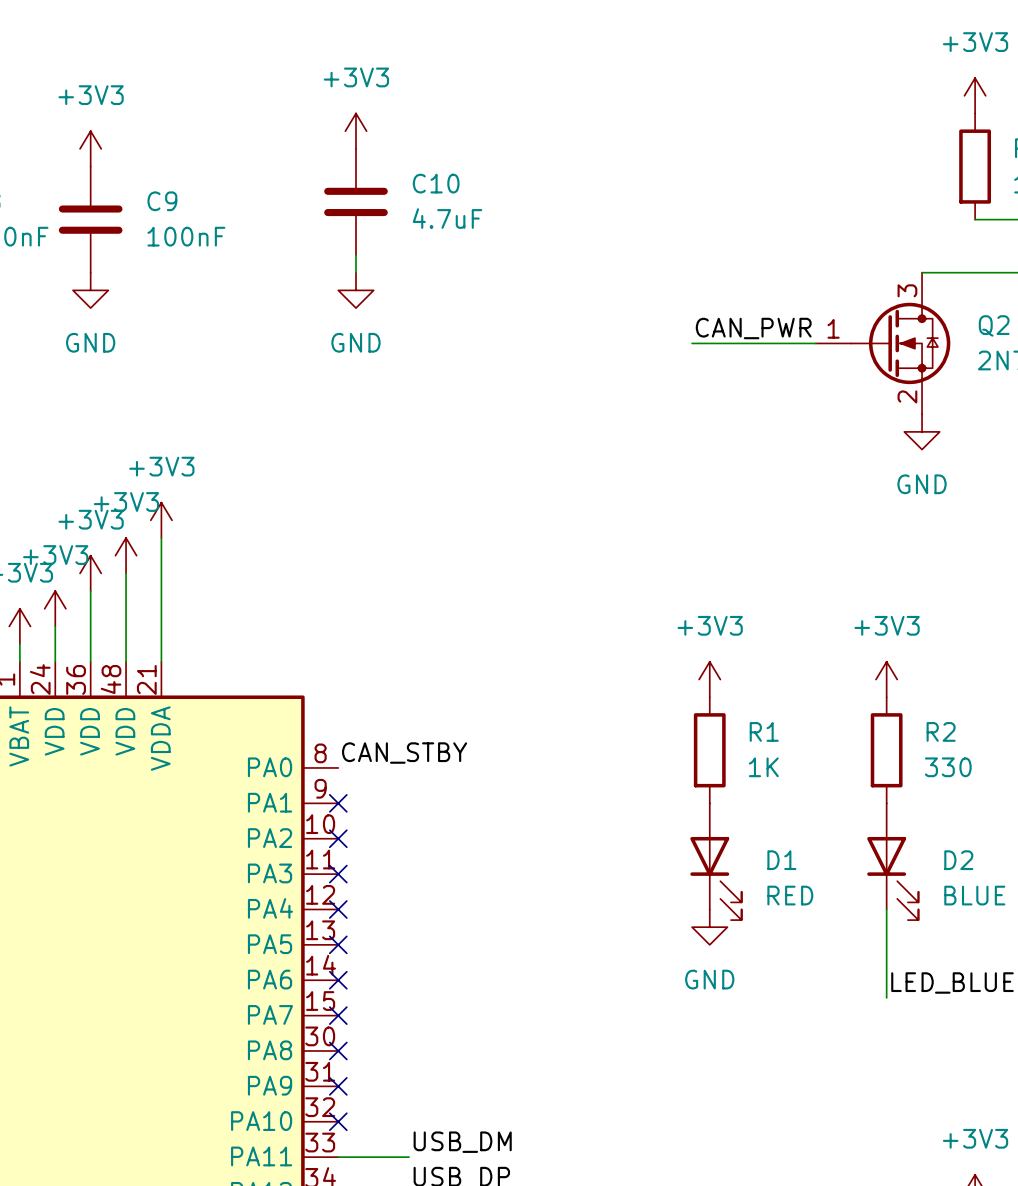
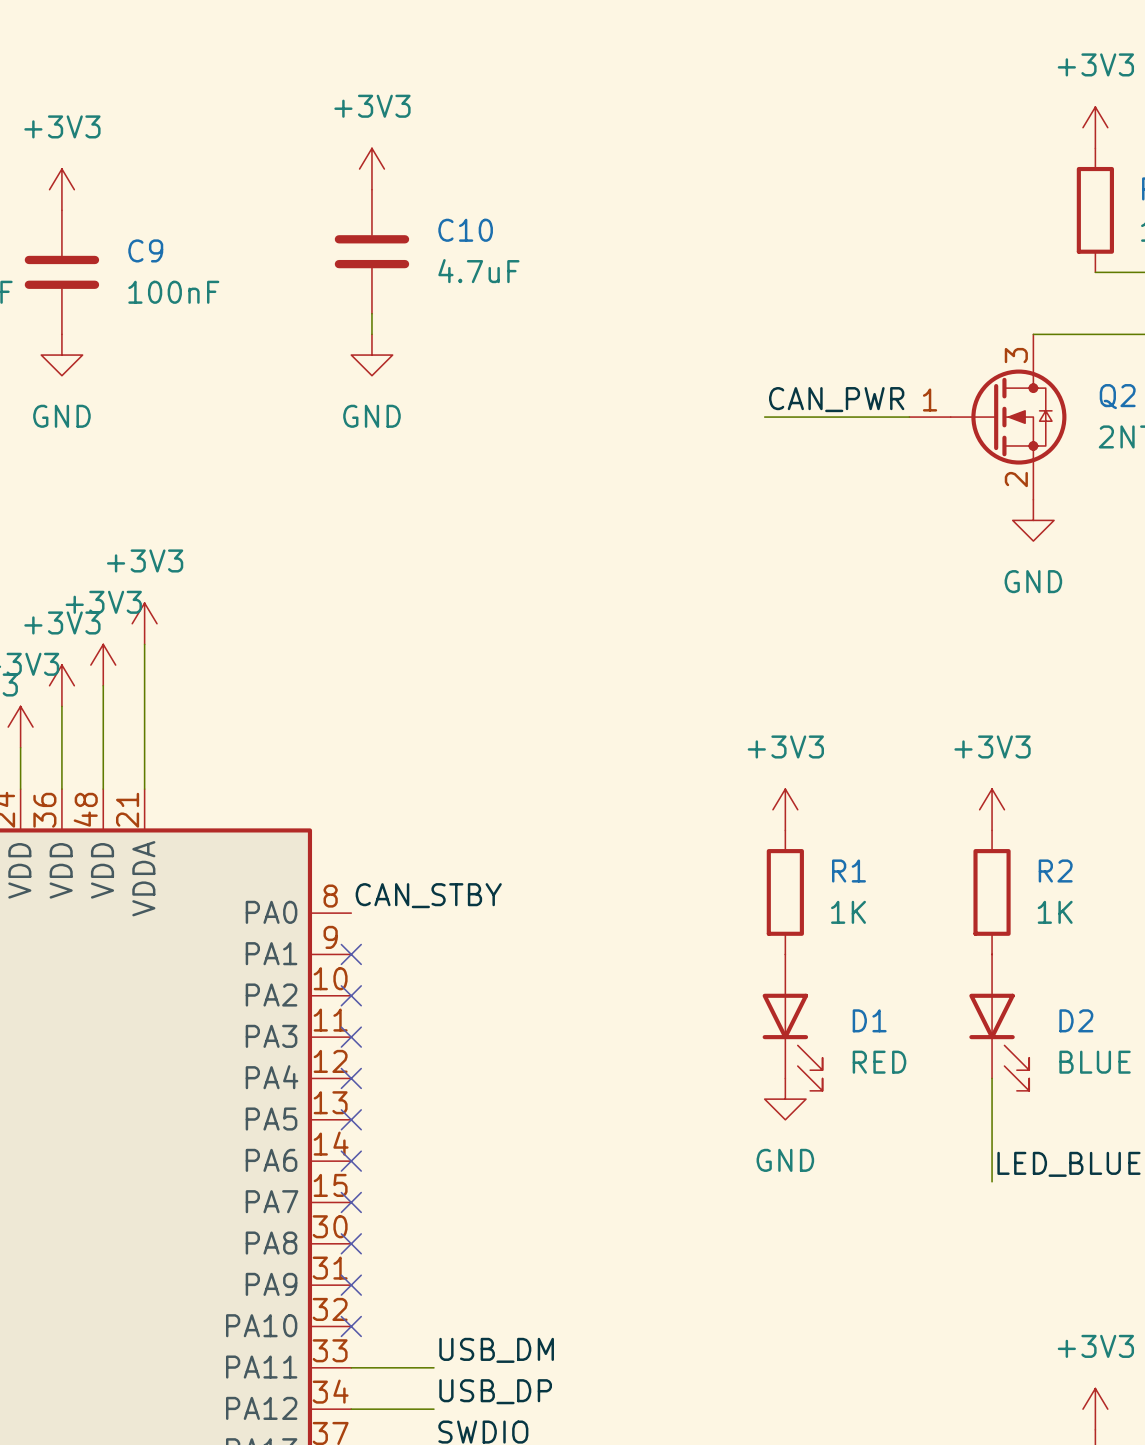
R2 value: 330 (948, 767) -> 1K (1055, 912)

